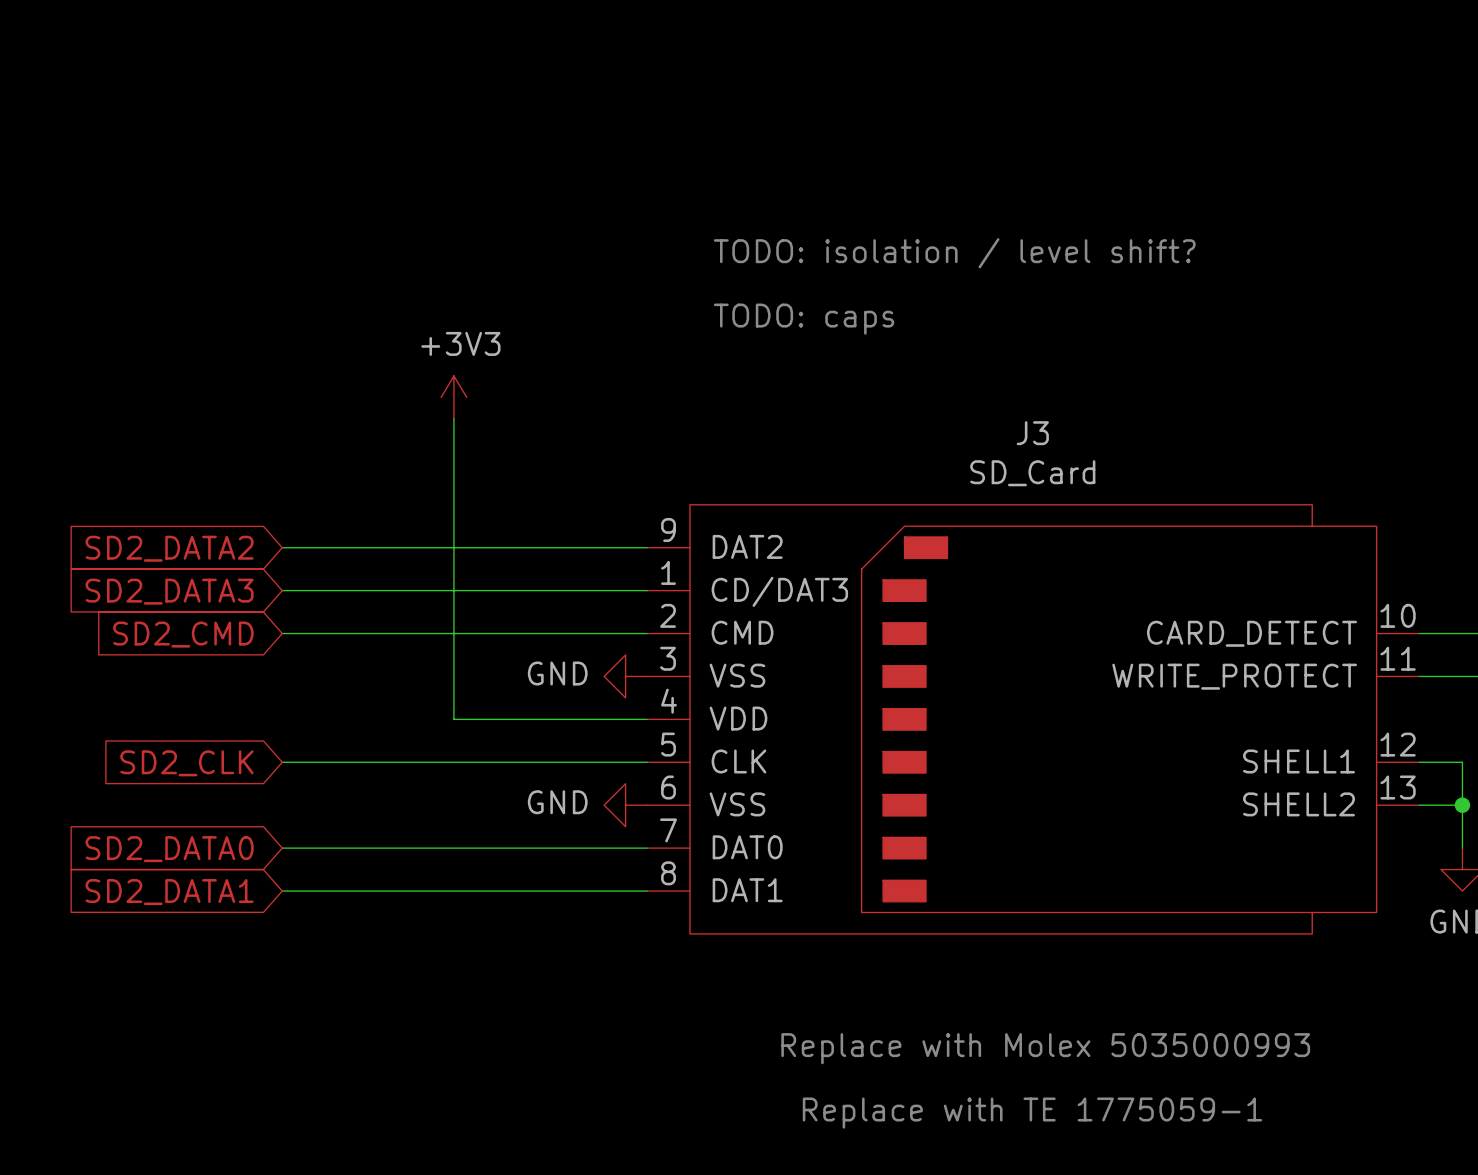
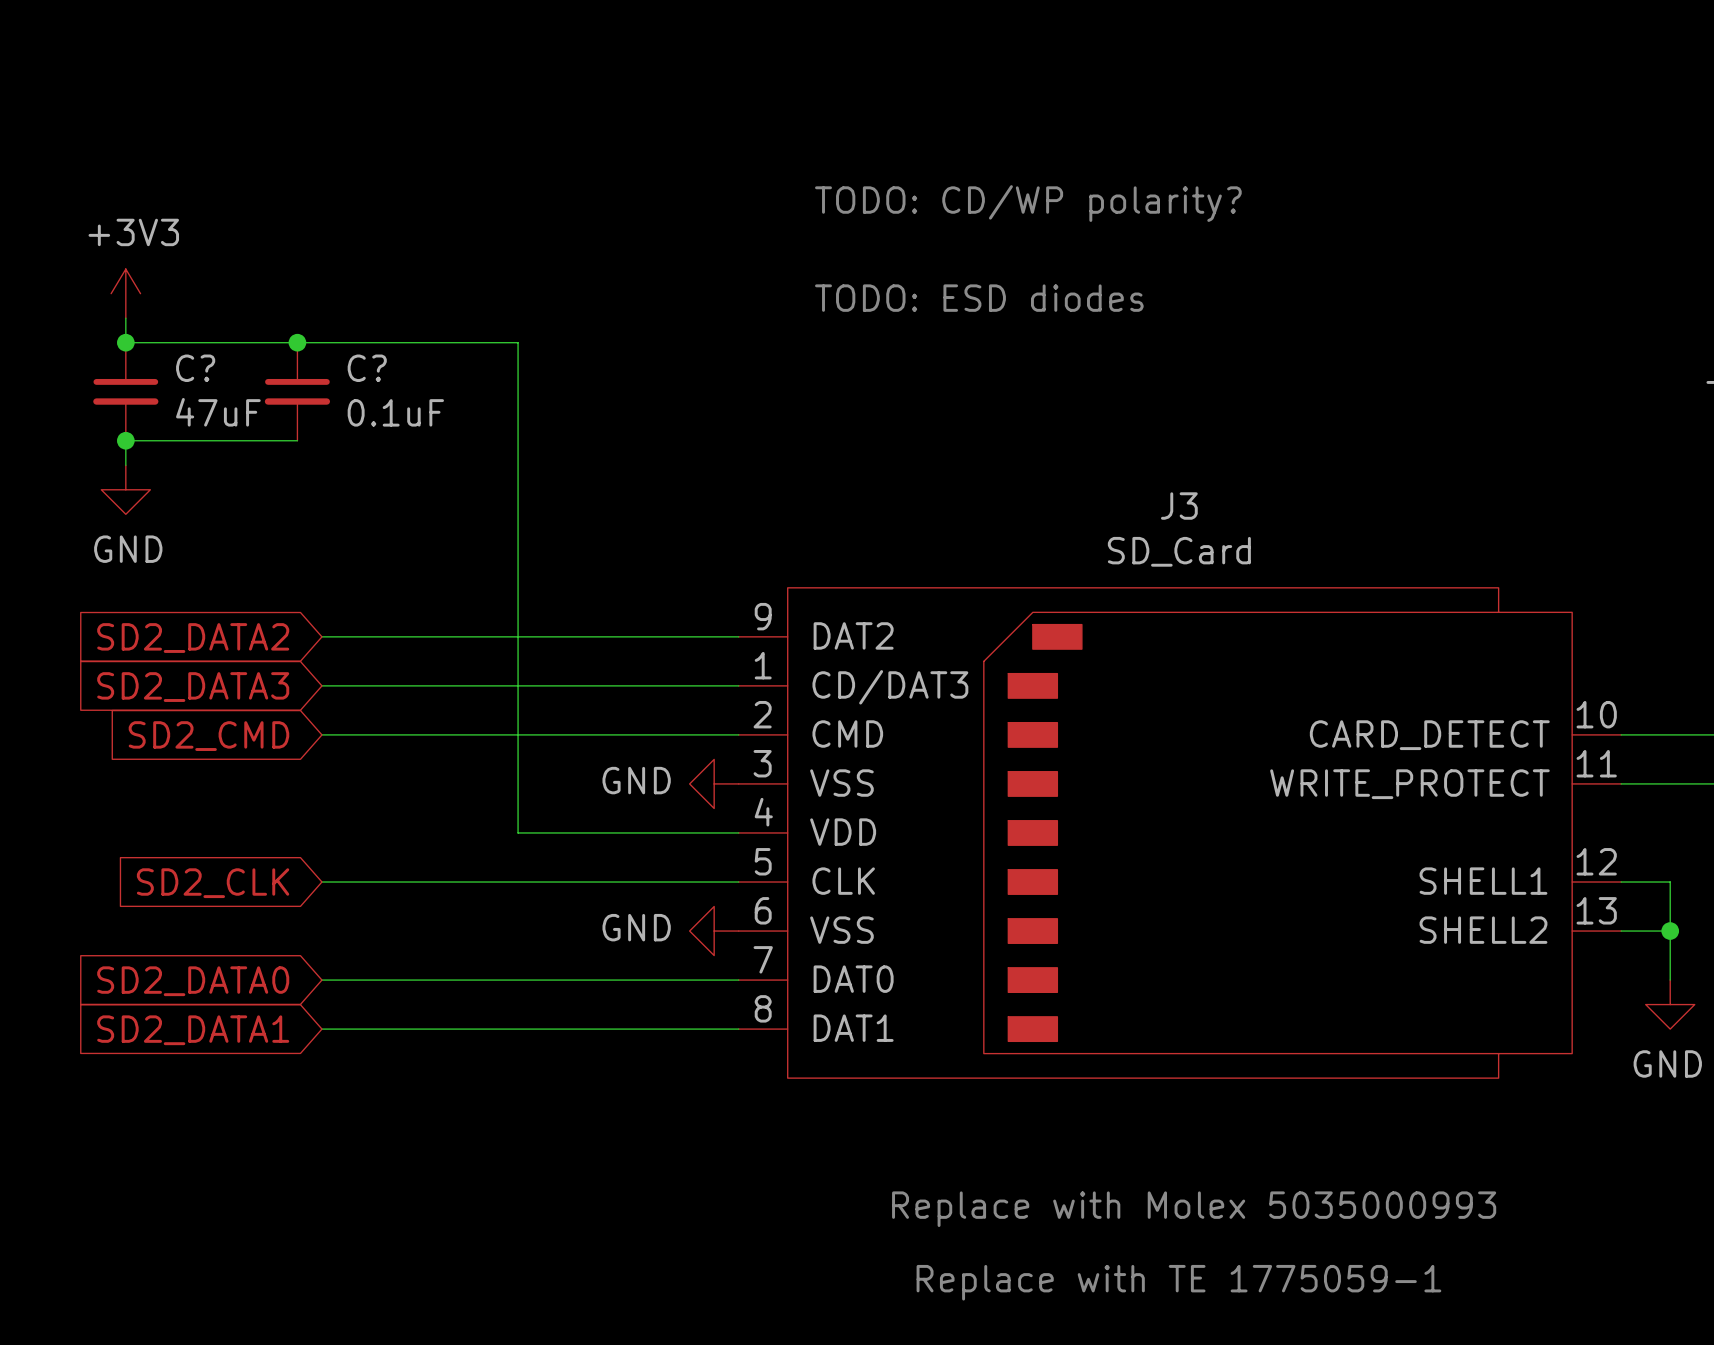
text: none -> TODO: CD/WP polarity? (1028, 203)
text: TODO: isolation / level shift? (954, 253) -> TODO: ESD diodes (979, 298)
wire: none -> (125, 318) (125, 342) (518, 342) (518, 489)
junction: none -> (125, 342)
junction: none -> (297, 342)
text: TODO: caps (804, 319) -> none
C?: none -> 47uF (125, 391)
C?: none -> 0.1uF (297, 391)
junction: none -> (125, 440)
wire: none -> (297, 440) (125, 440) (125, 465)
power symbol position: +3V3 (453, 397) -> +3V3 (125, 293)
power symbol: none -> GND (125, 489)

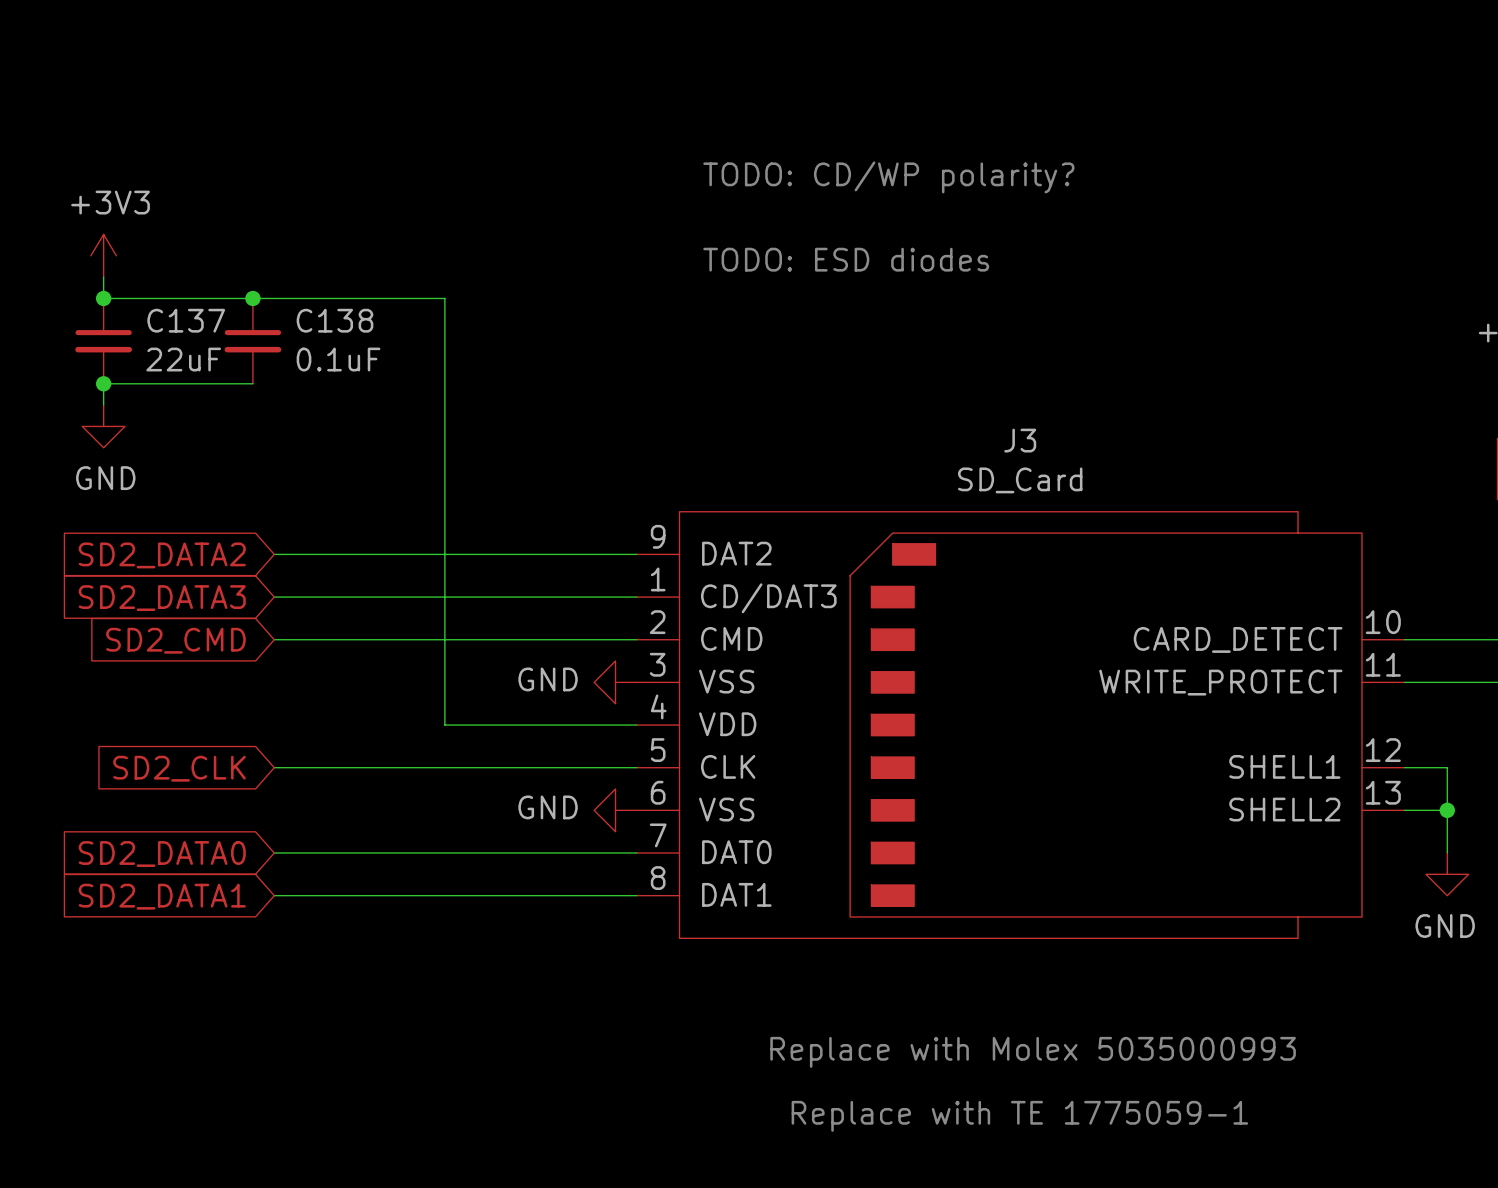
C? name: C? (195, 368) -> C137 (186, 320)
C? name: C? (367, 368) -> C138 (334, 320)
C? value: 47uF (218, 412) -> 22uF (183, 359)

